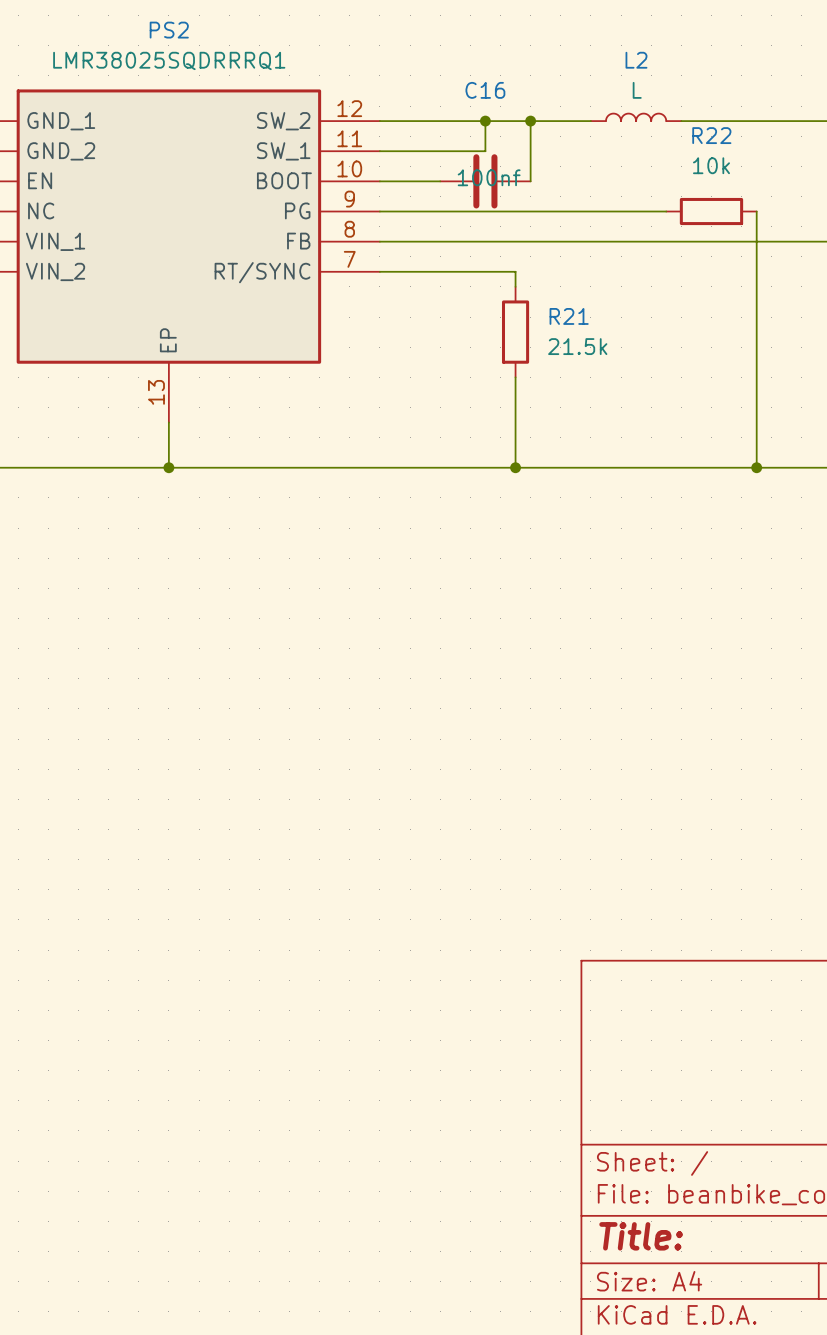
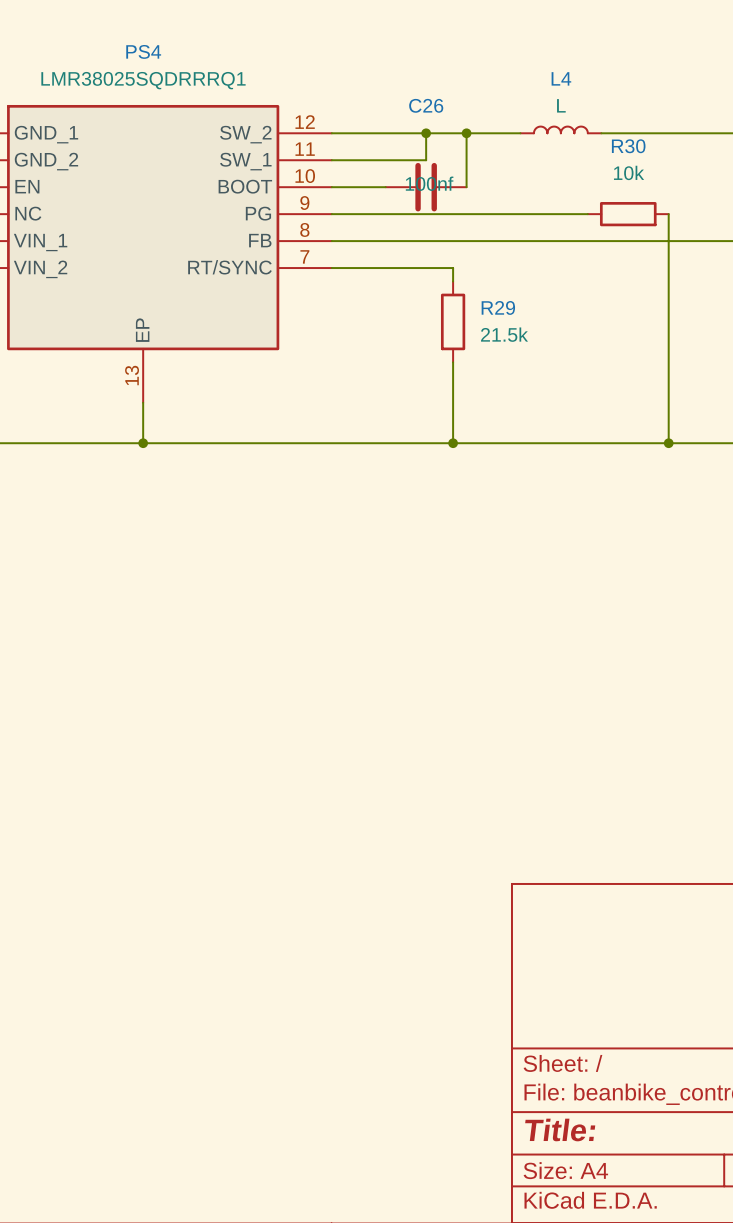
PS2 name: PS2 (169, 30) -> PS4 (143, 51)
L2 name: L2 (636, 60) -> L4 (561, 78)
C16 name: C16 (485, 90) -> C26 (426, 105)
R22 name: R22 (711, 135) -> R30 (628, 146)
R21 name: R21 (569, 316) -> R29 (498, 307)

